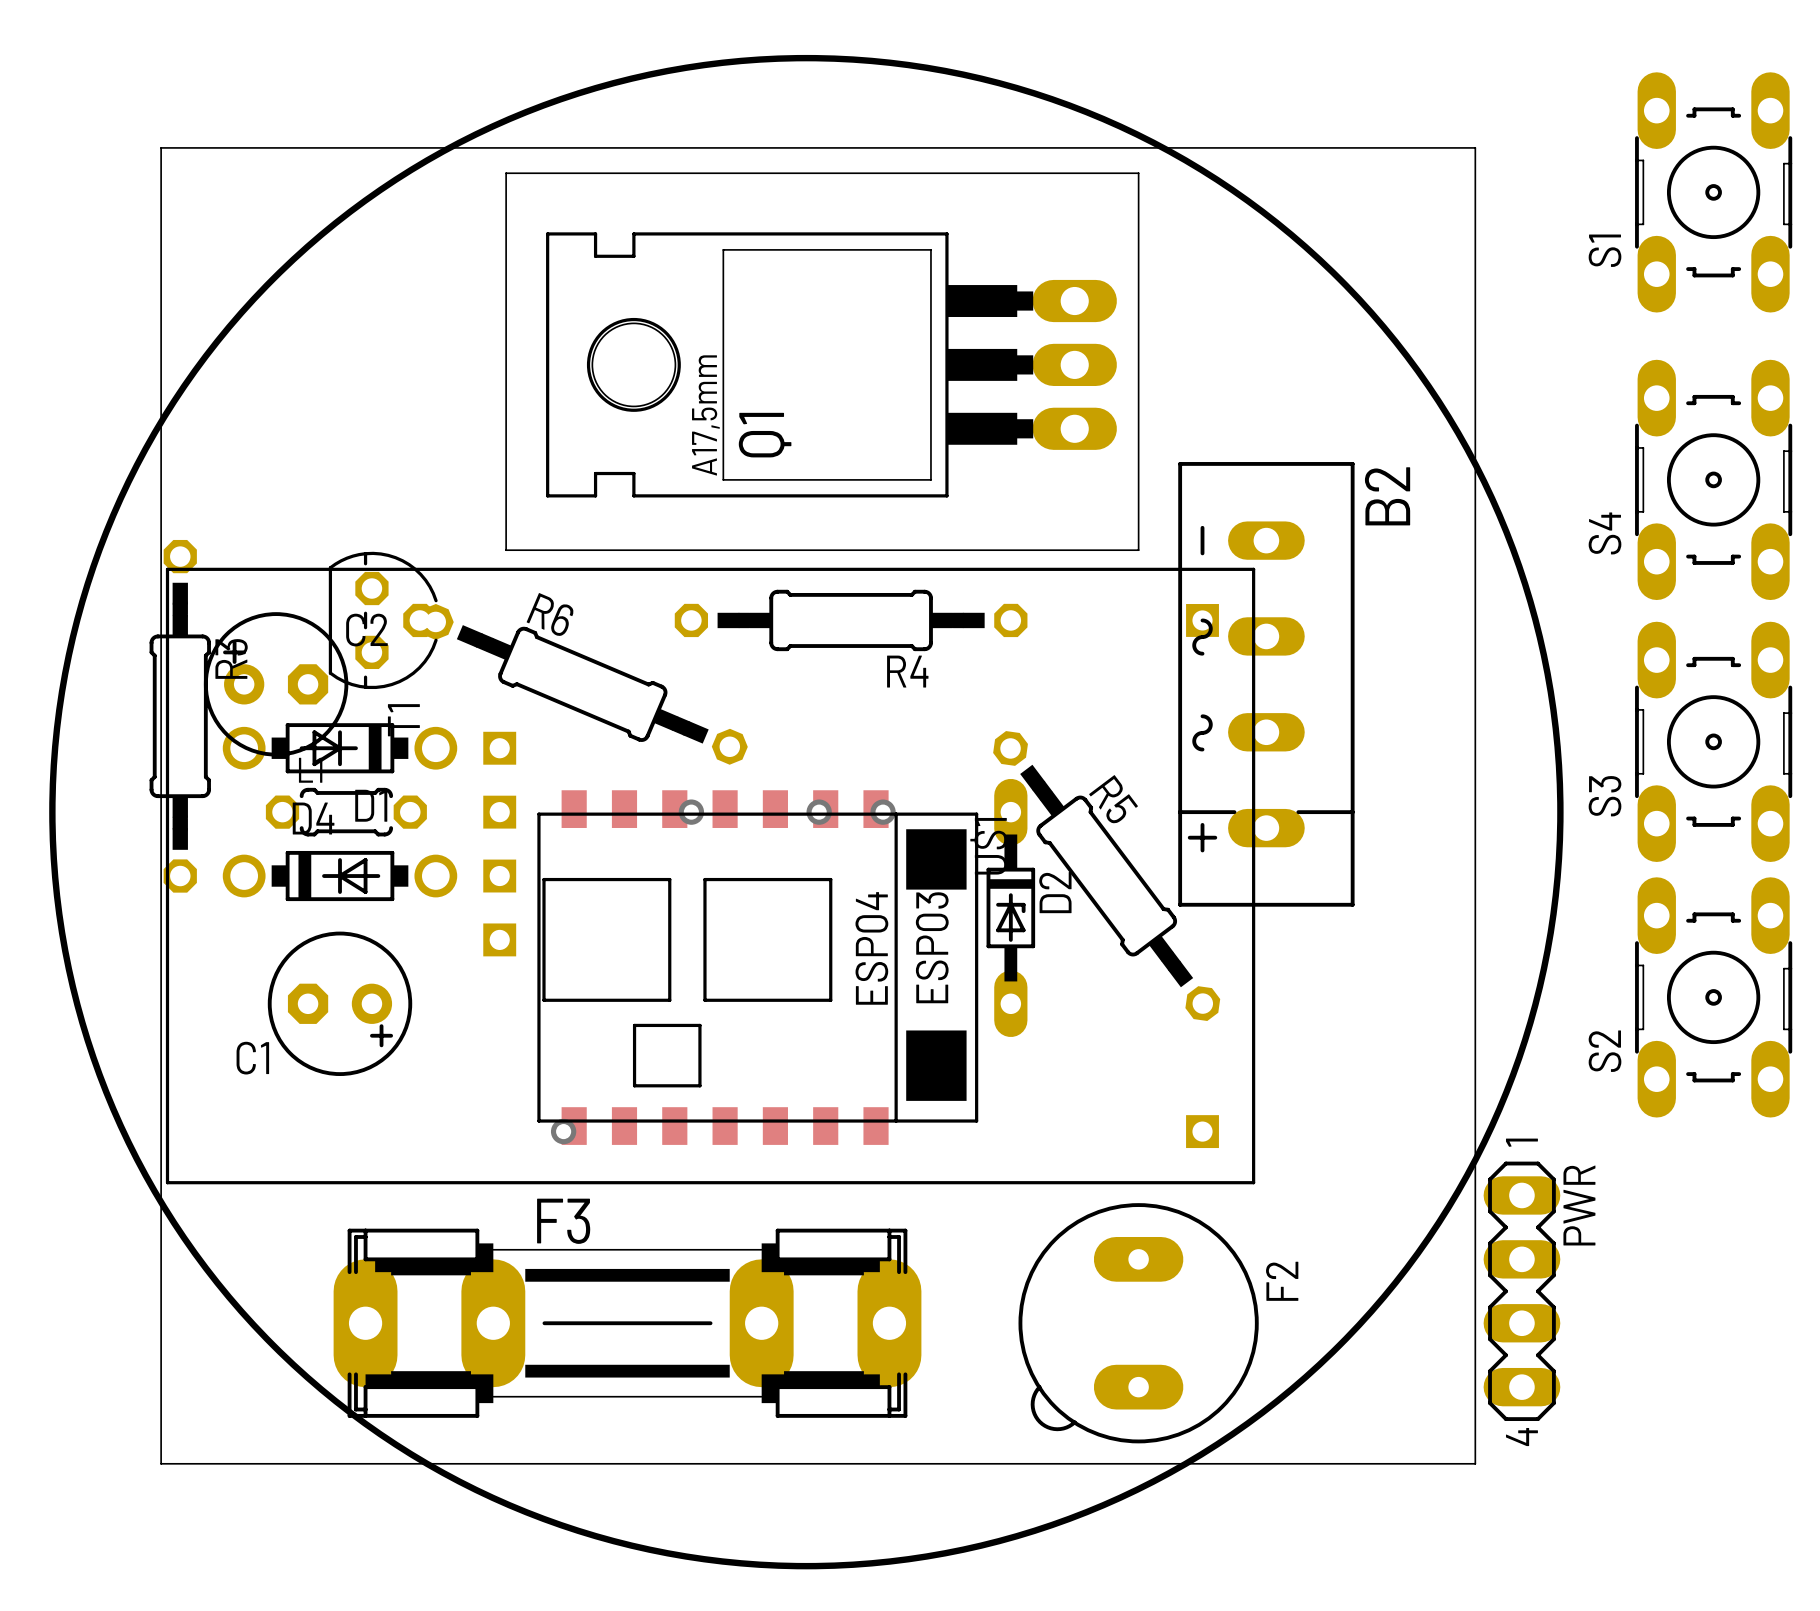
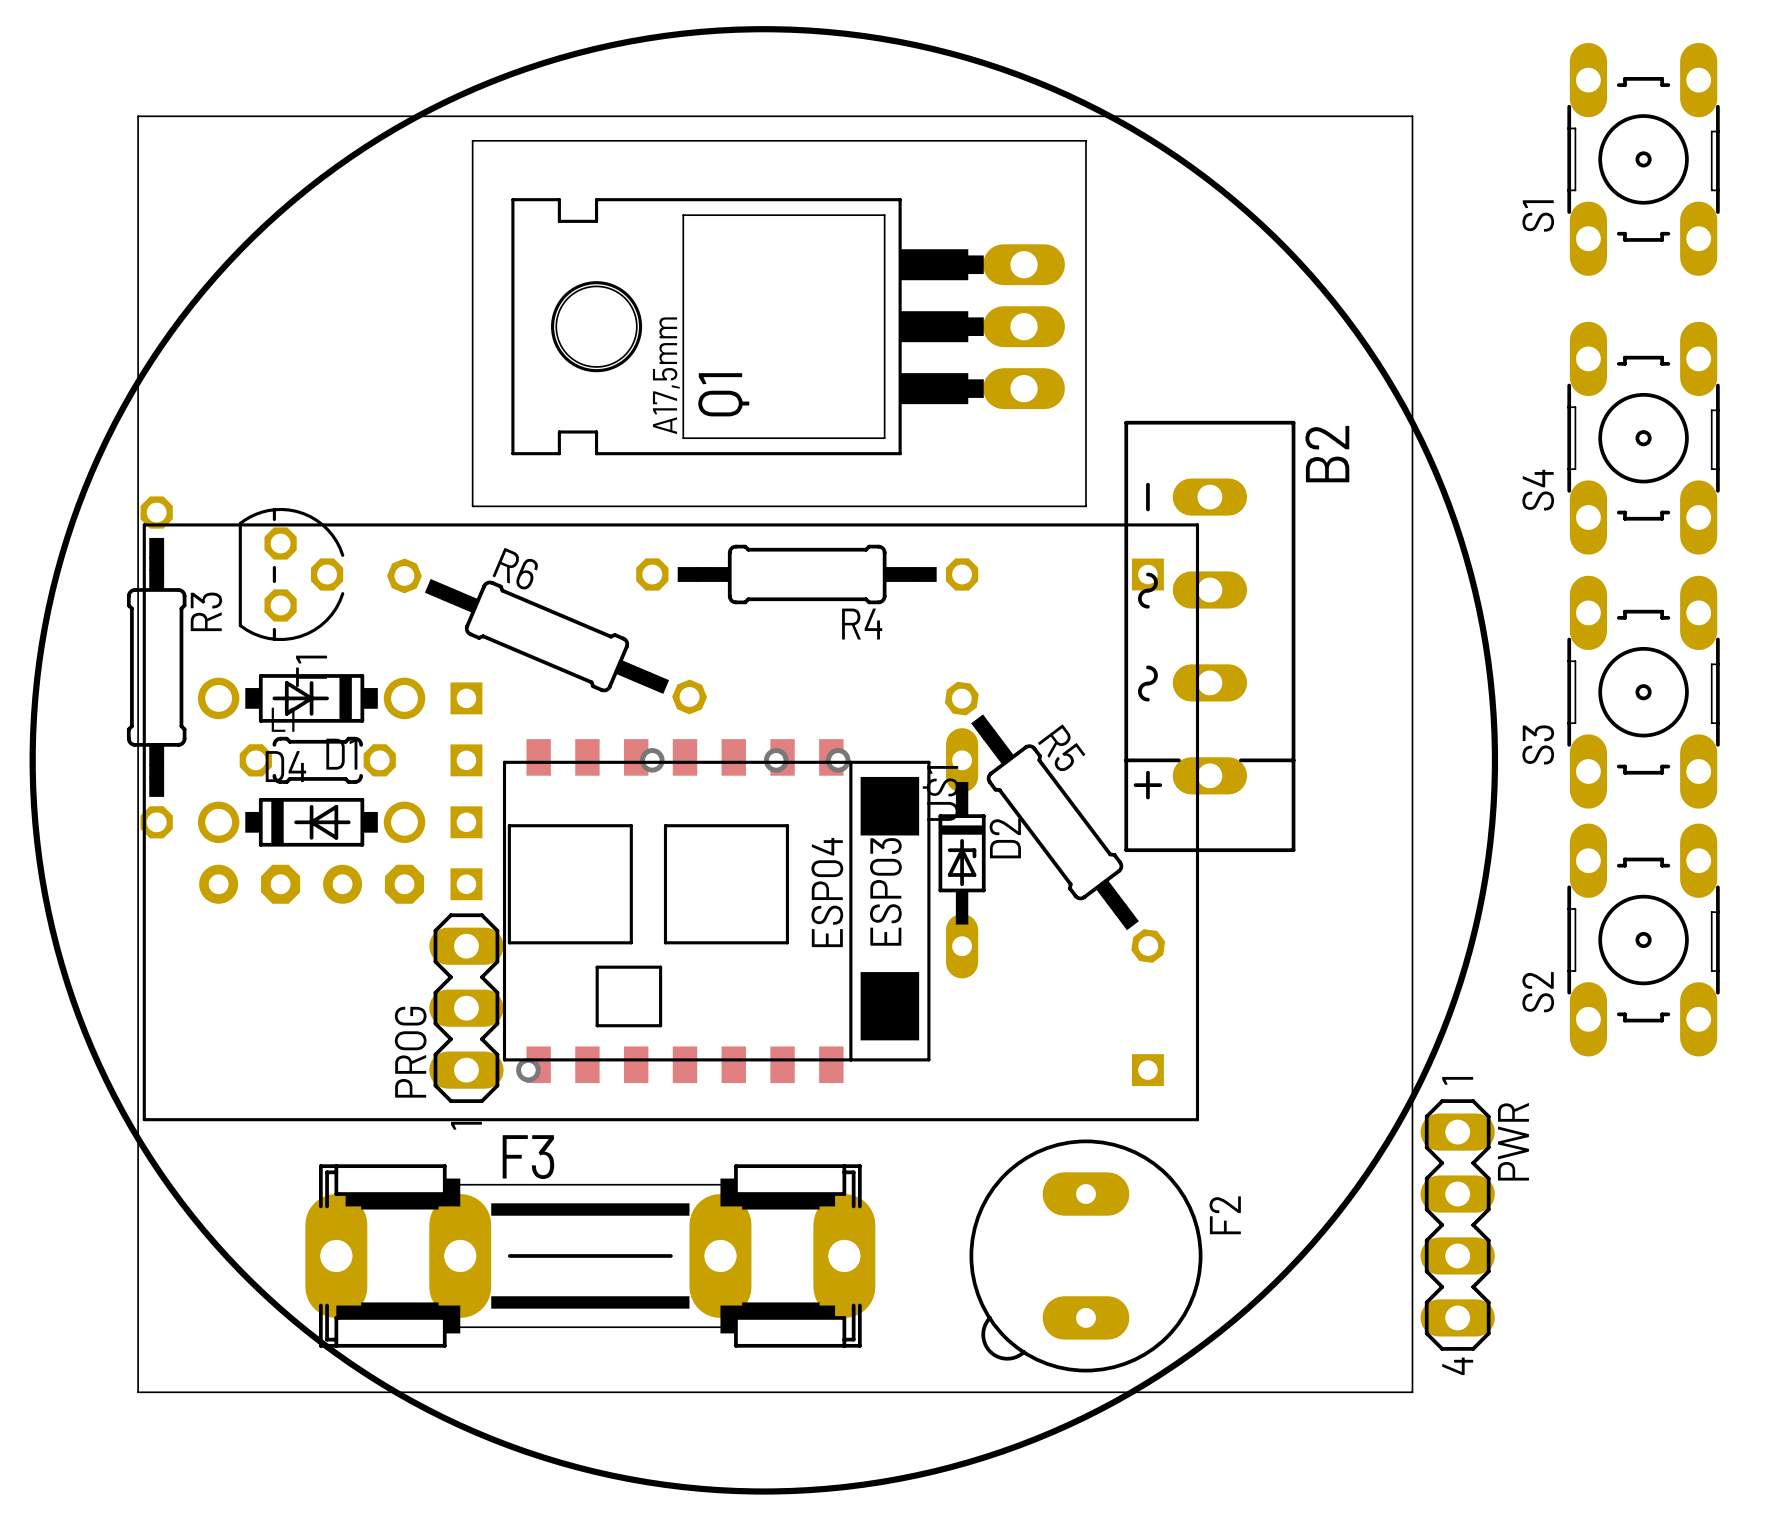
T1 position: (383, 620) -> (291, 574)
C2 side: top (276, 684) -> bottom (249, 884)
C1 side: top (340, 1003) -> bottom (373, 884)
PROG: none -> (466, 1008)

